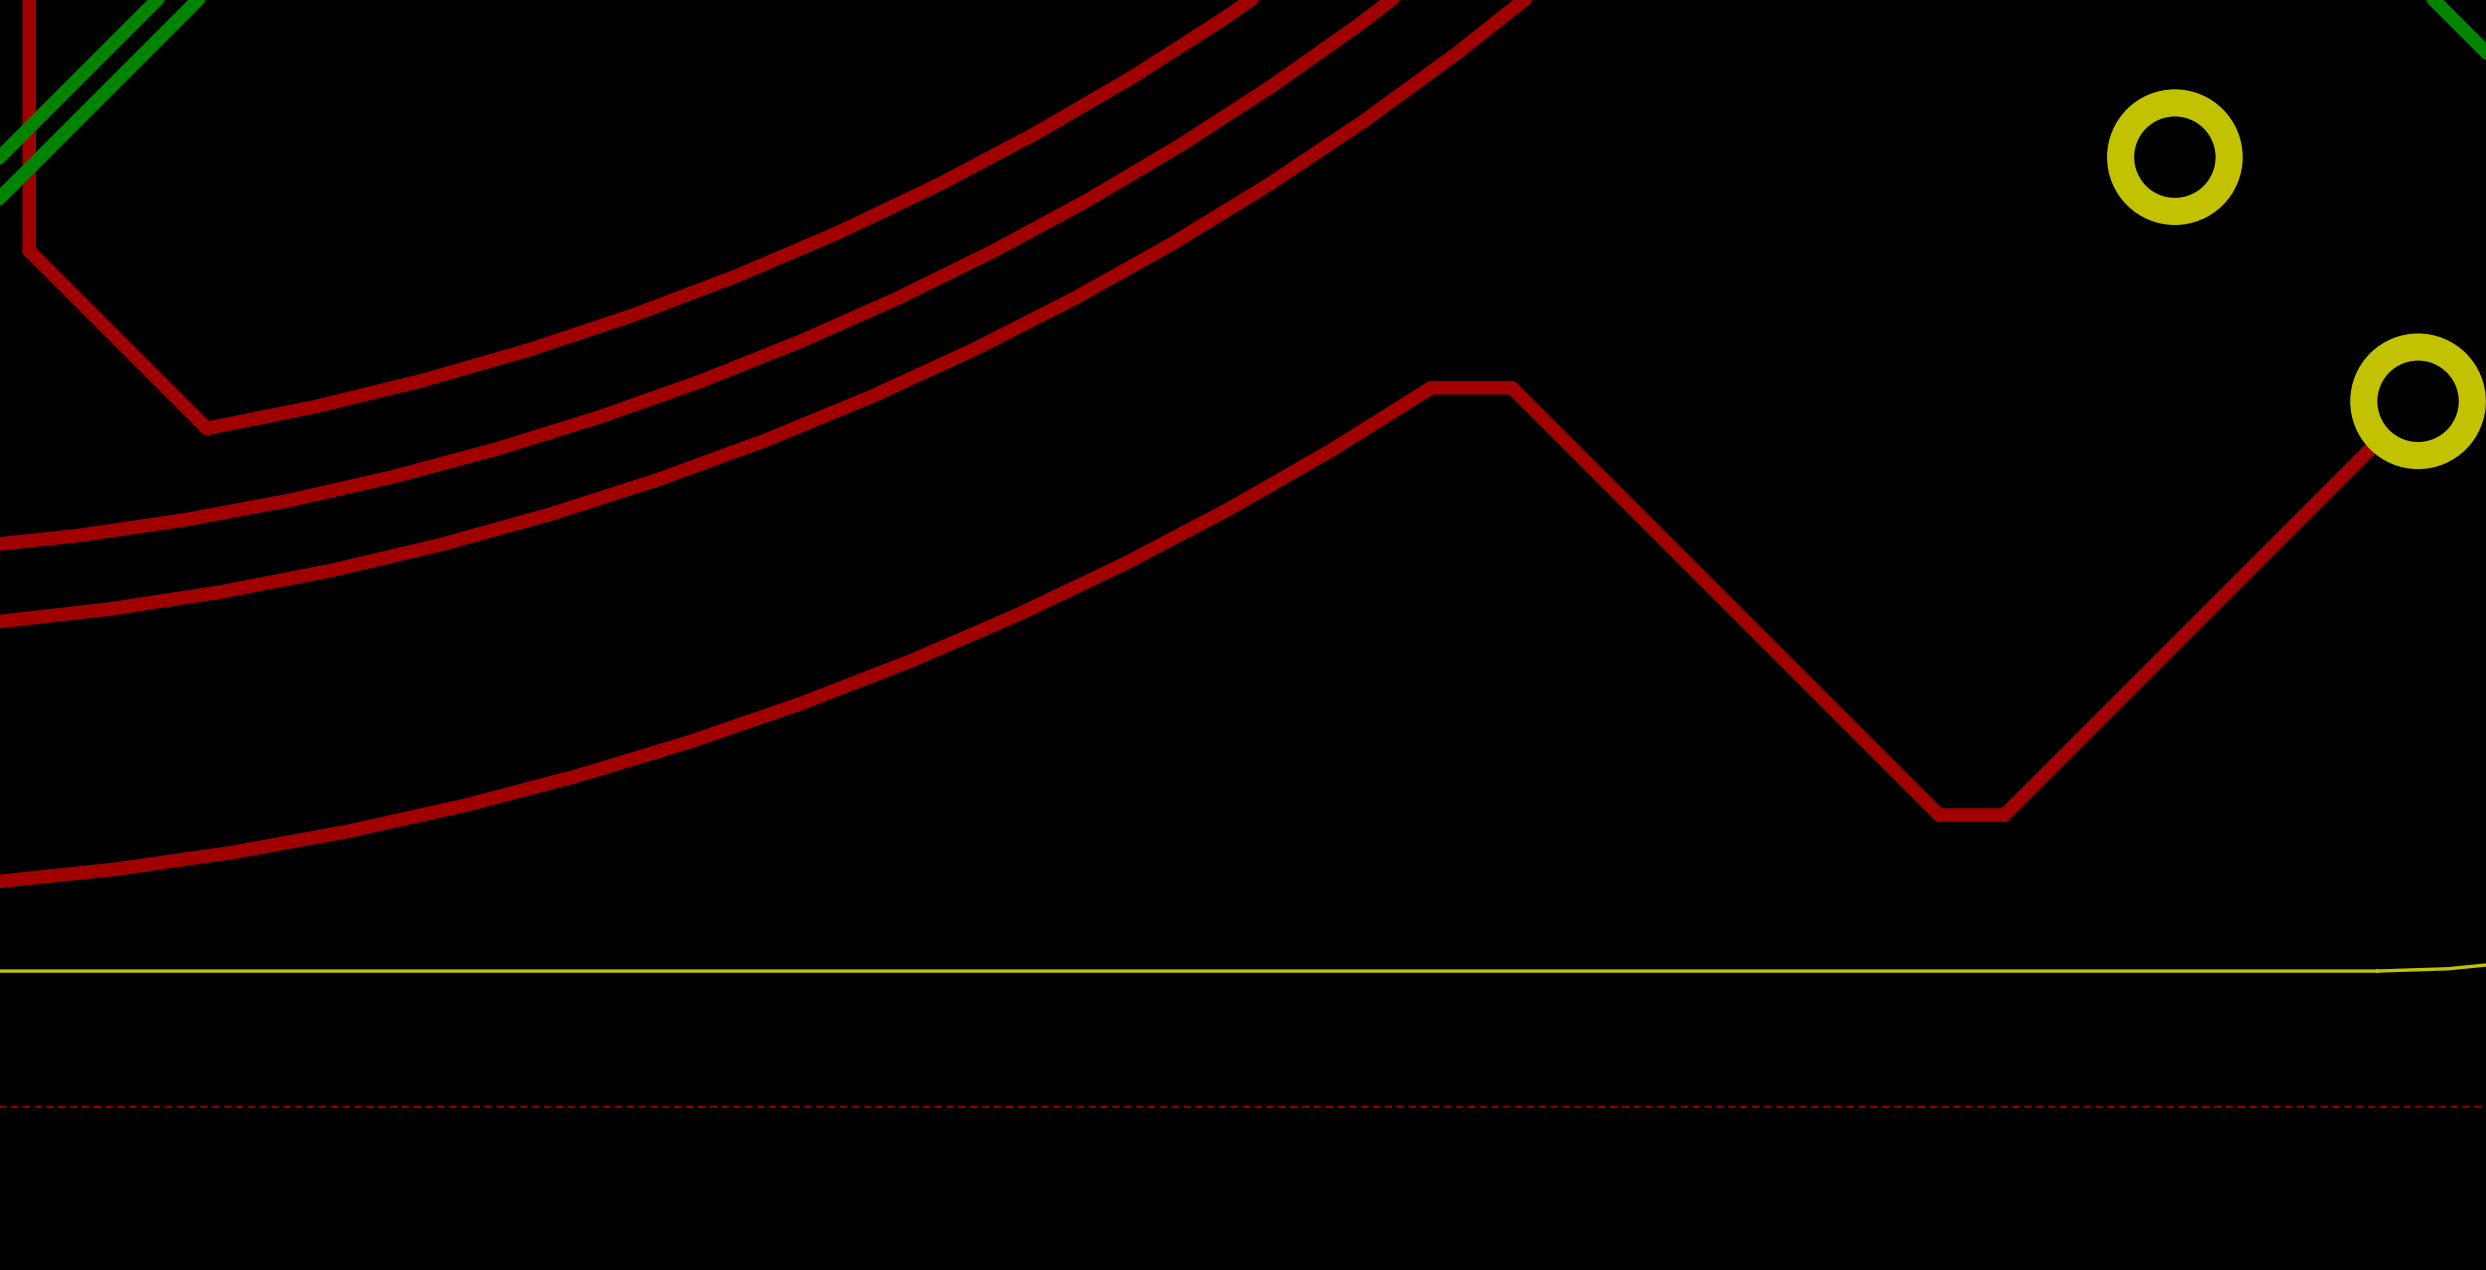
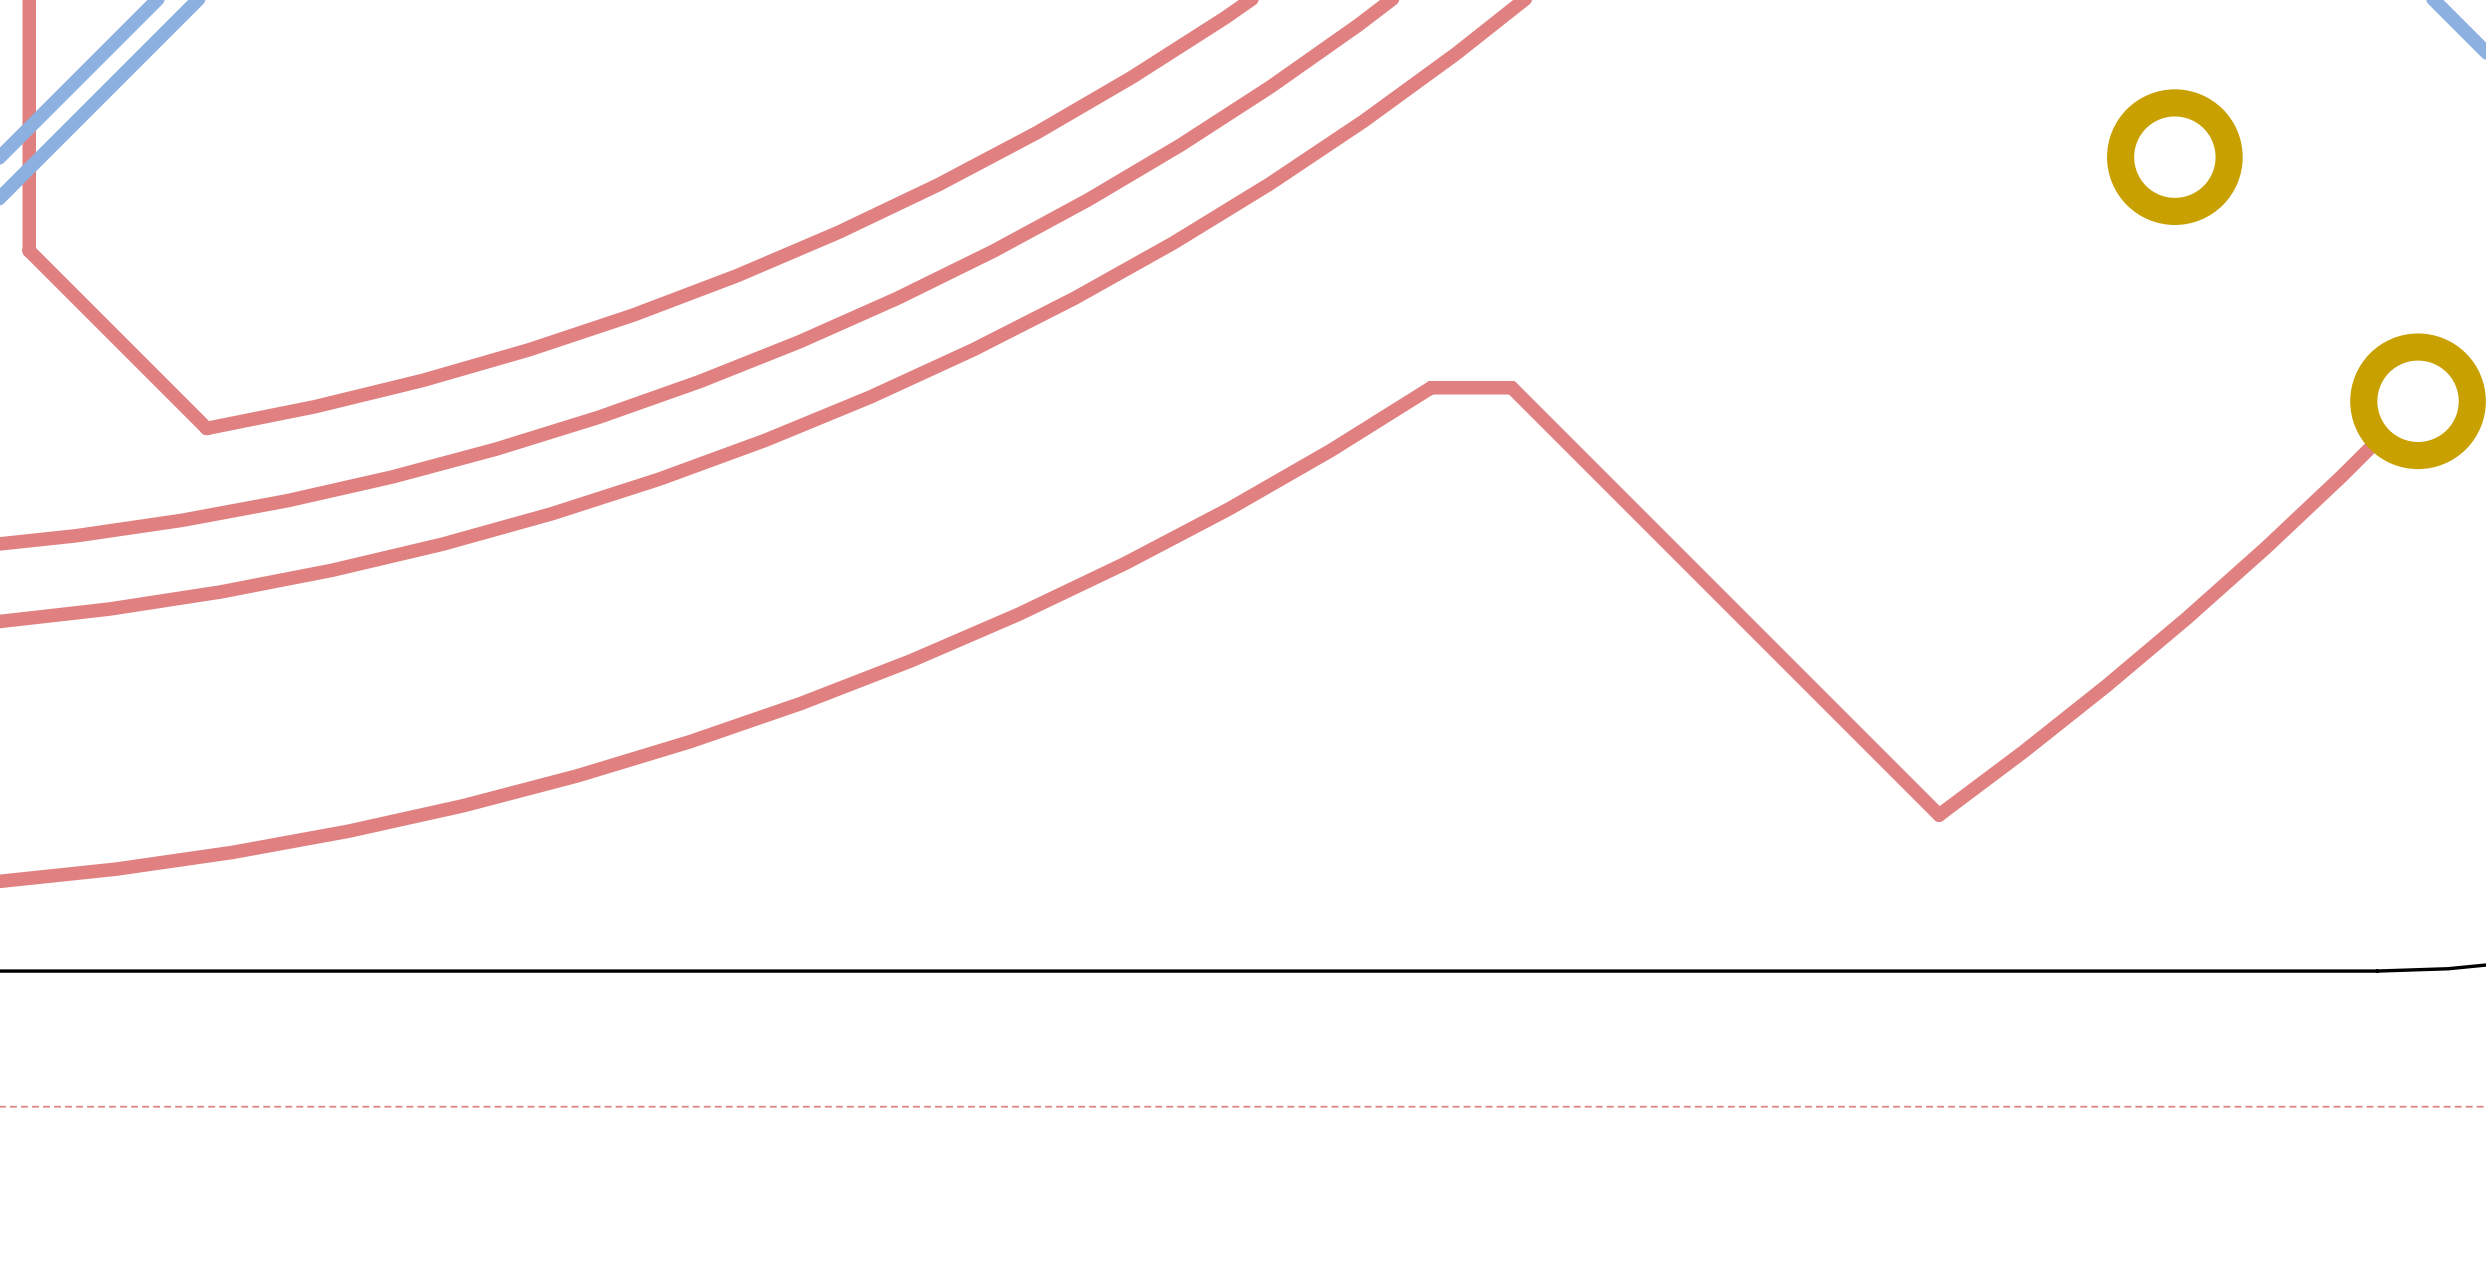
top track: (2418, 401) (2004, 815) (1939, 815) -> (2417, 401) (2342, 475) (2186, 618) (2023, 751) (1939, 815)

